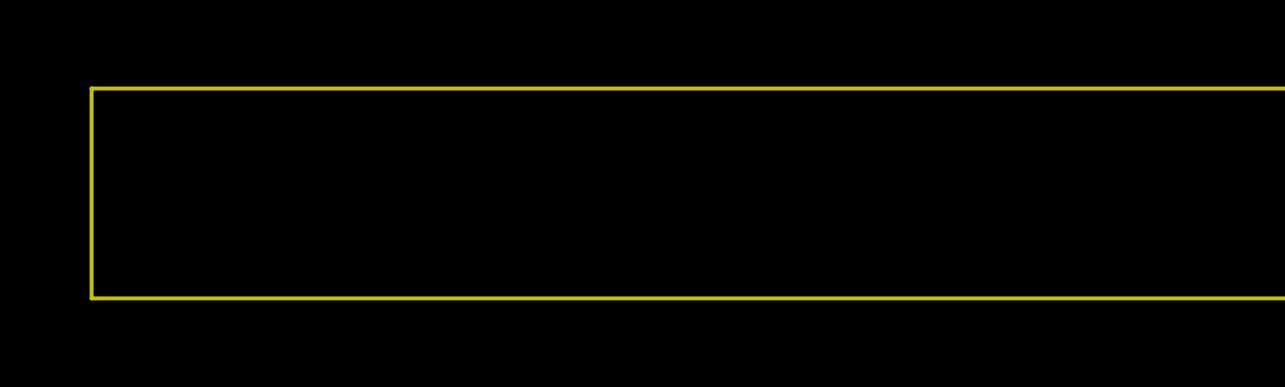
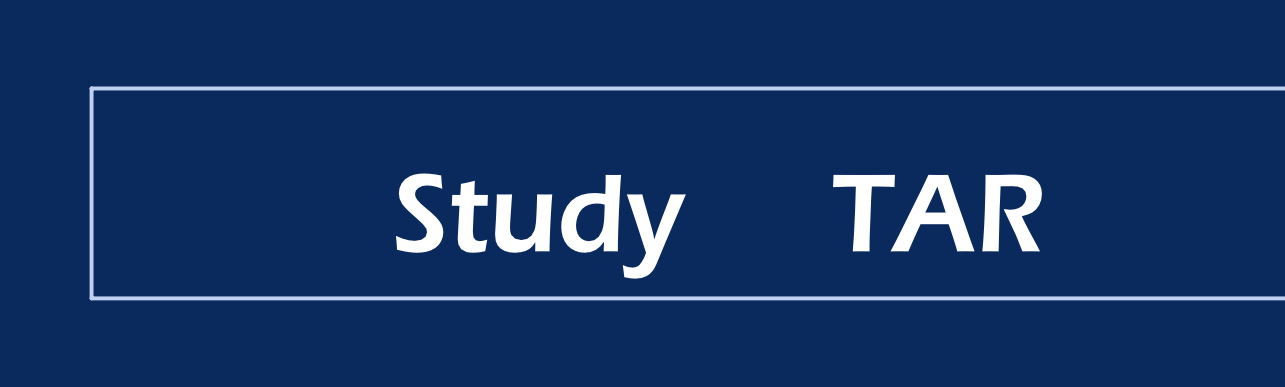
drawing: none -> [395, 173, 1042, 279]

